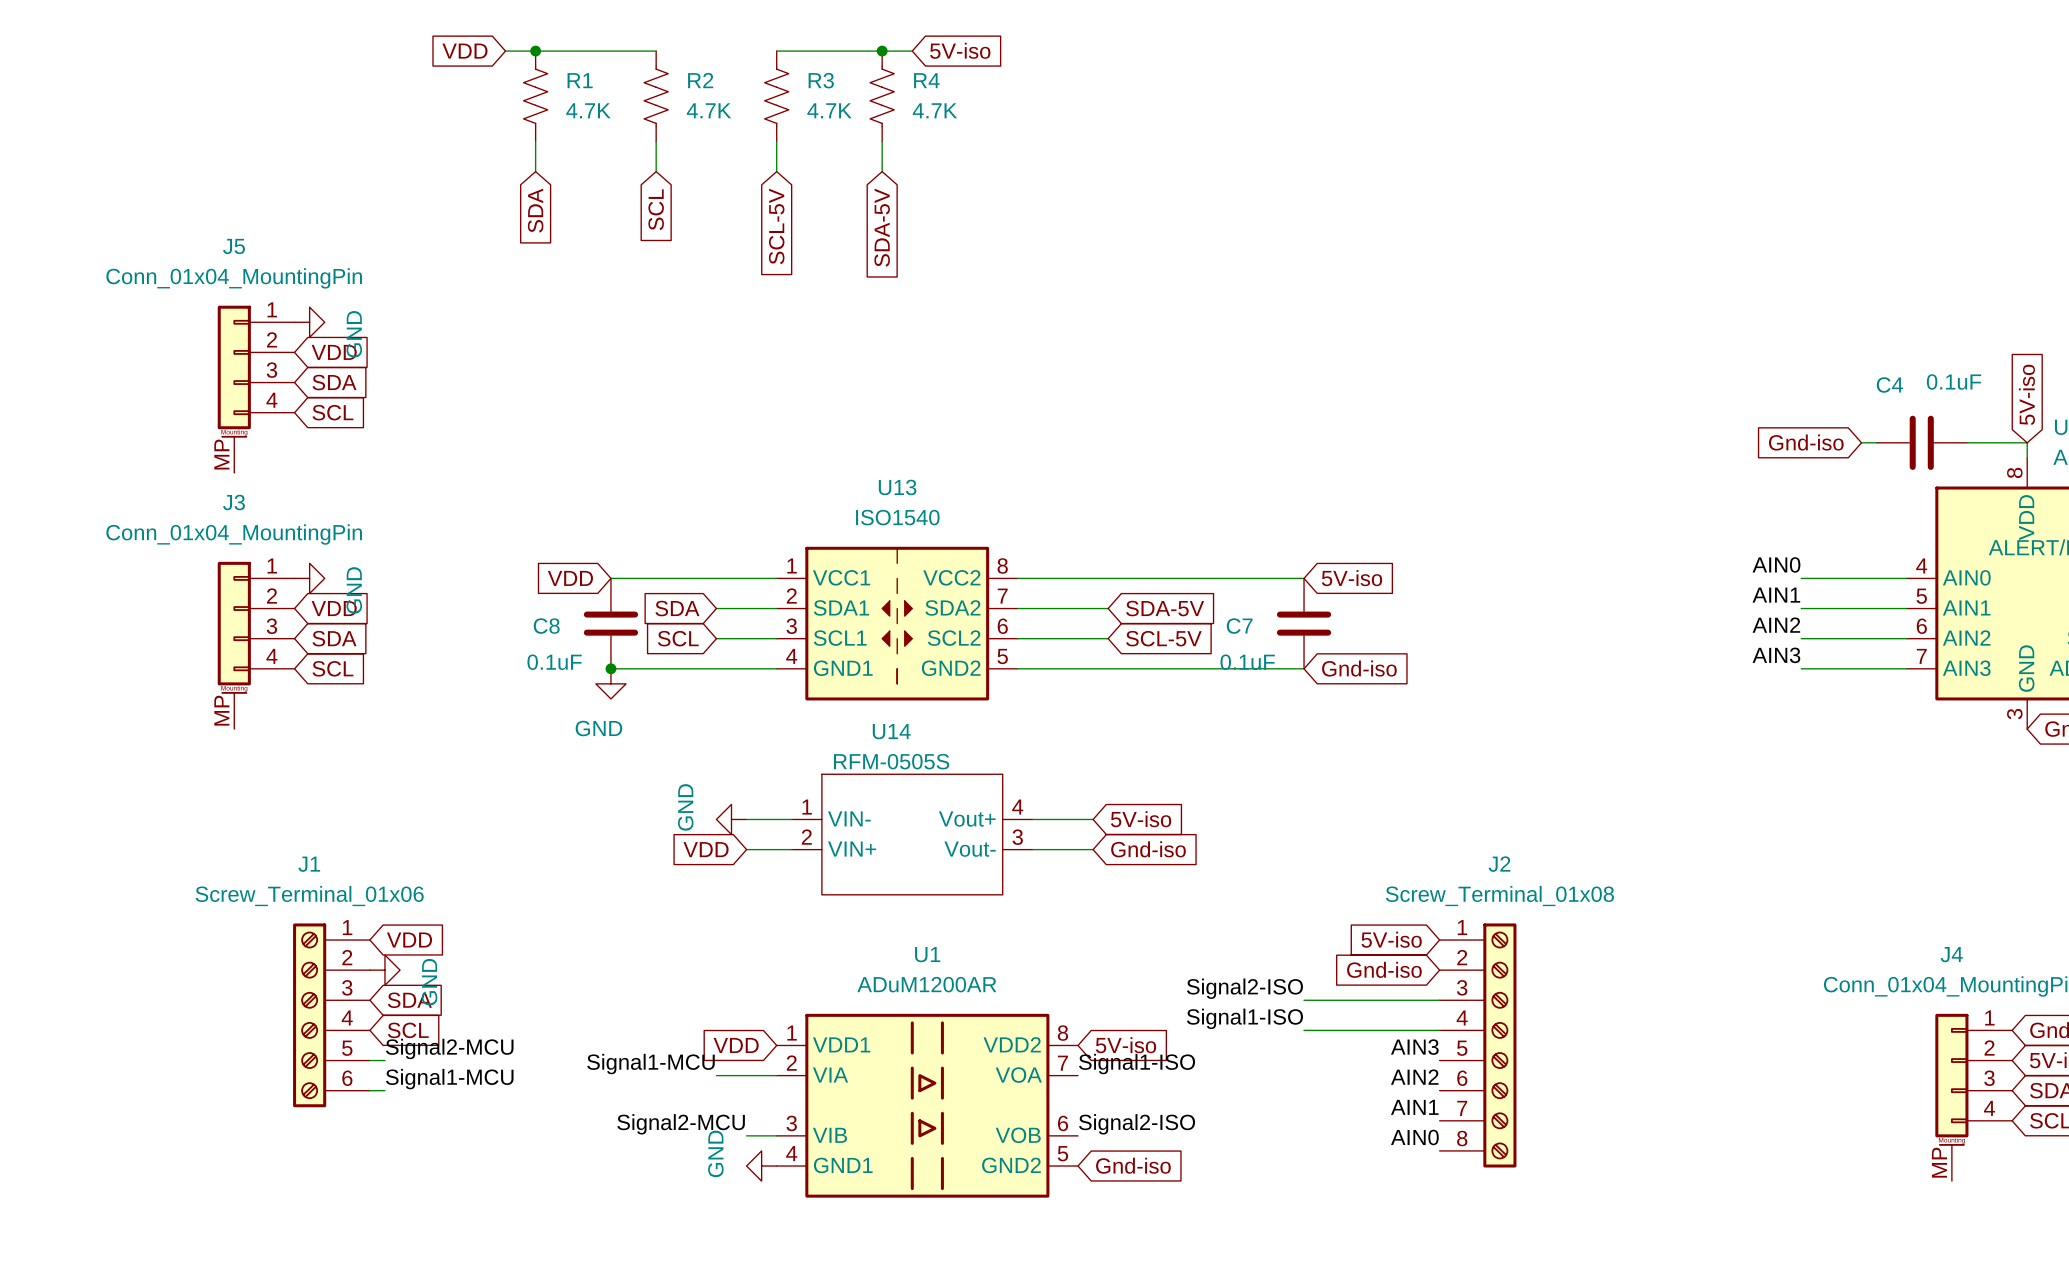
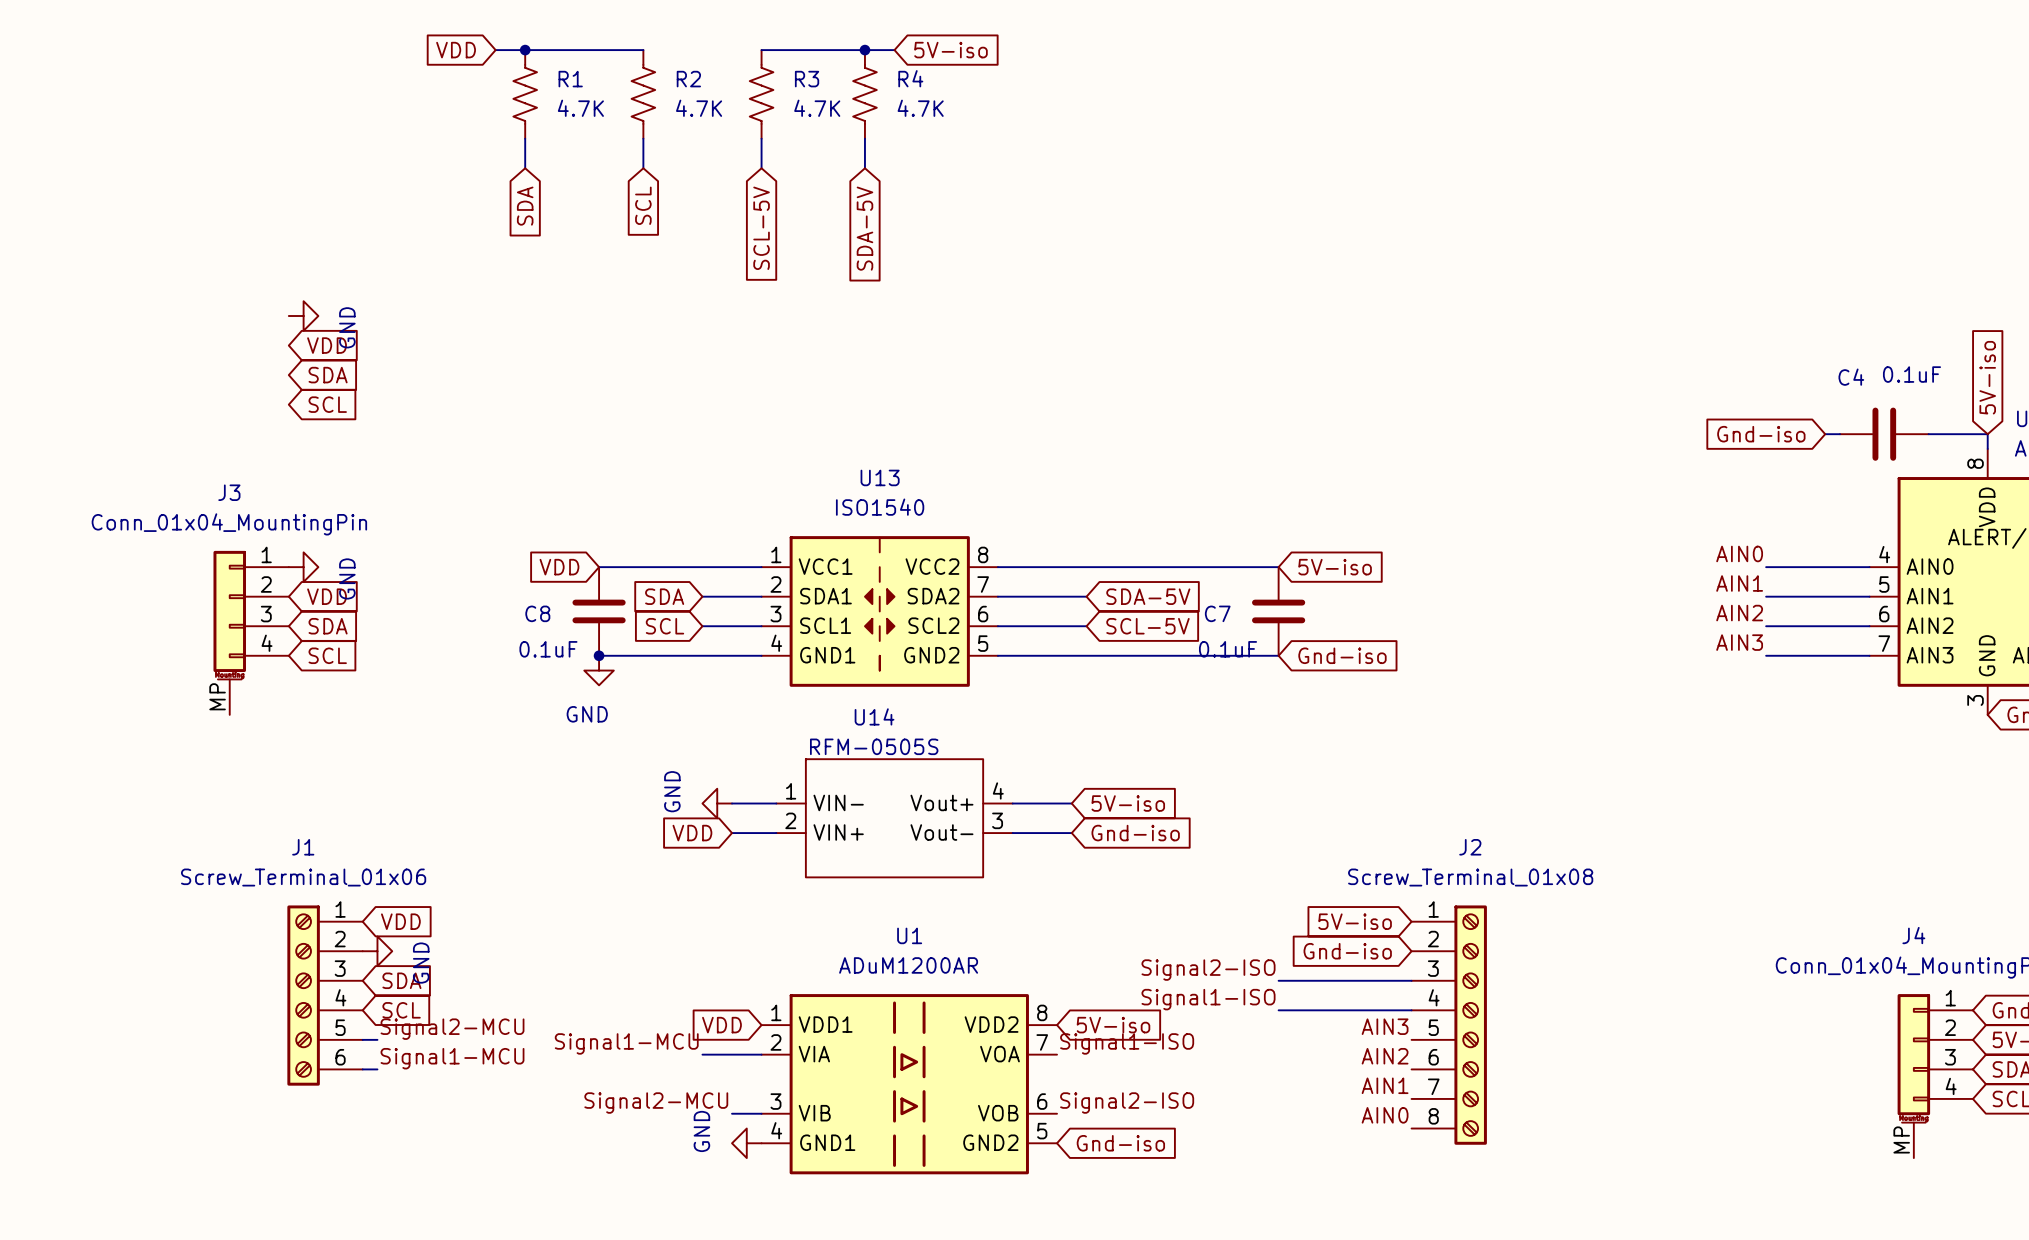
J5: Conn_01x04_MountingPin (256, 389) -> none

